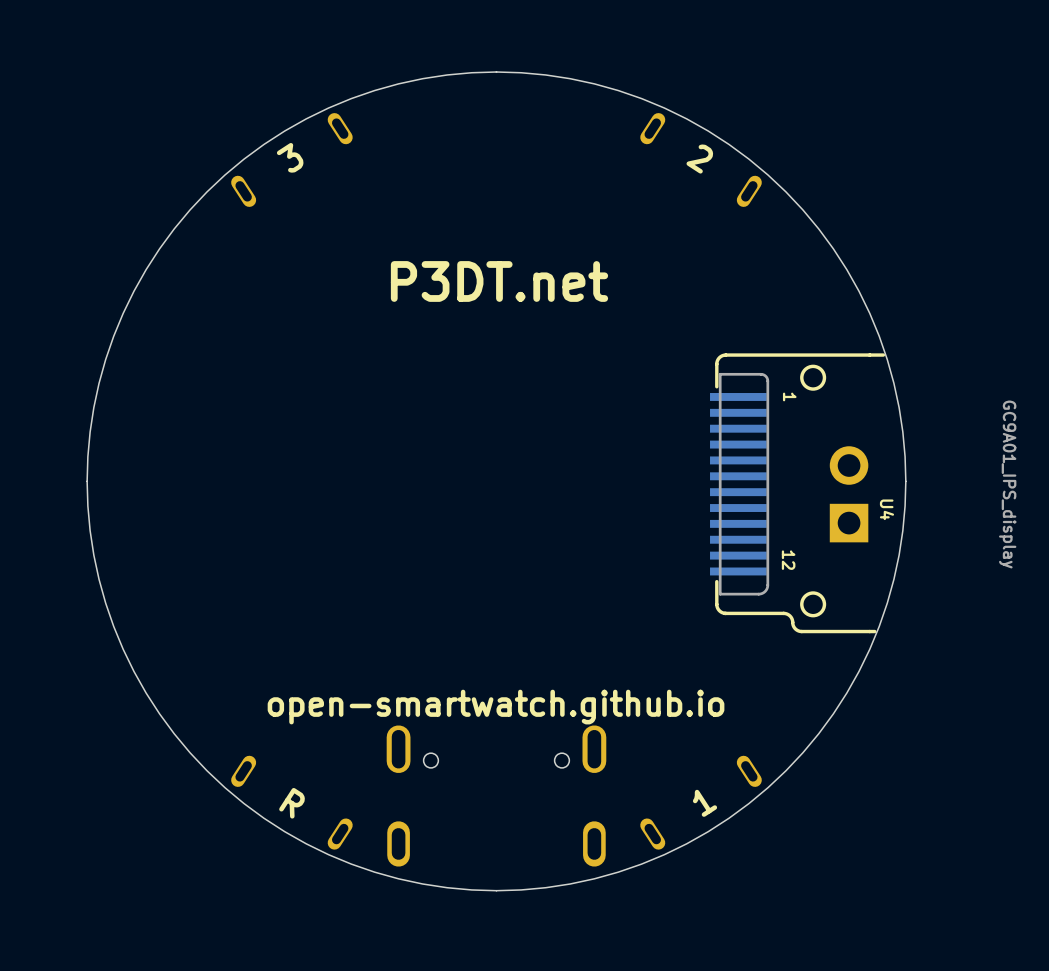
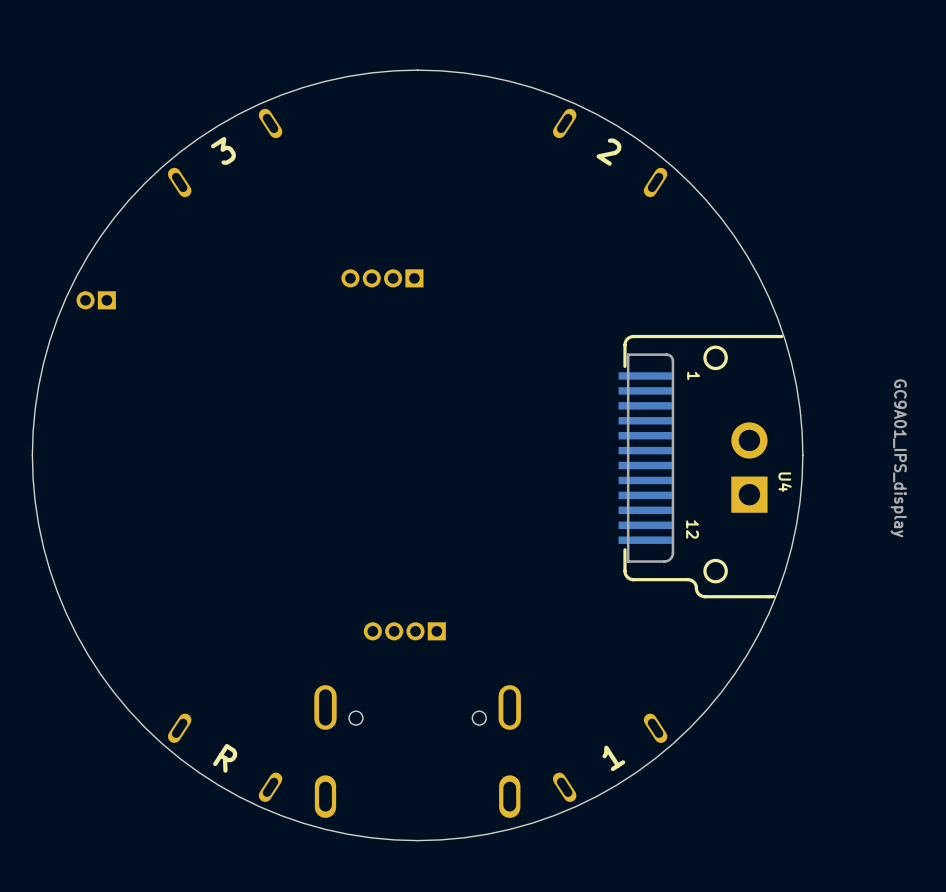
text: P3DT.net (499, 281) -> none
part: none -> (382, 278)
part: none -> (96, 300)
part: none -> (404, 631)
text: open-smartwatch.github.io (496, 707) -> none

